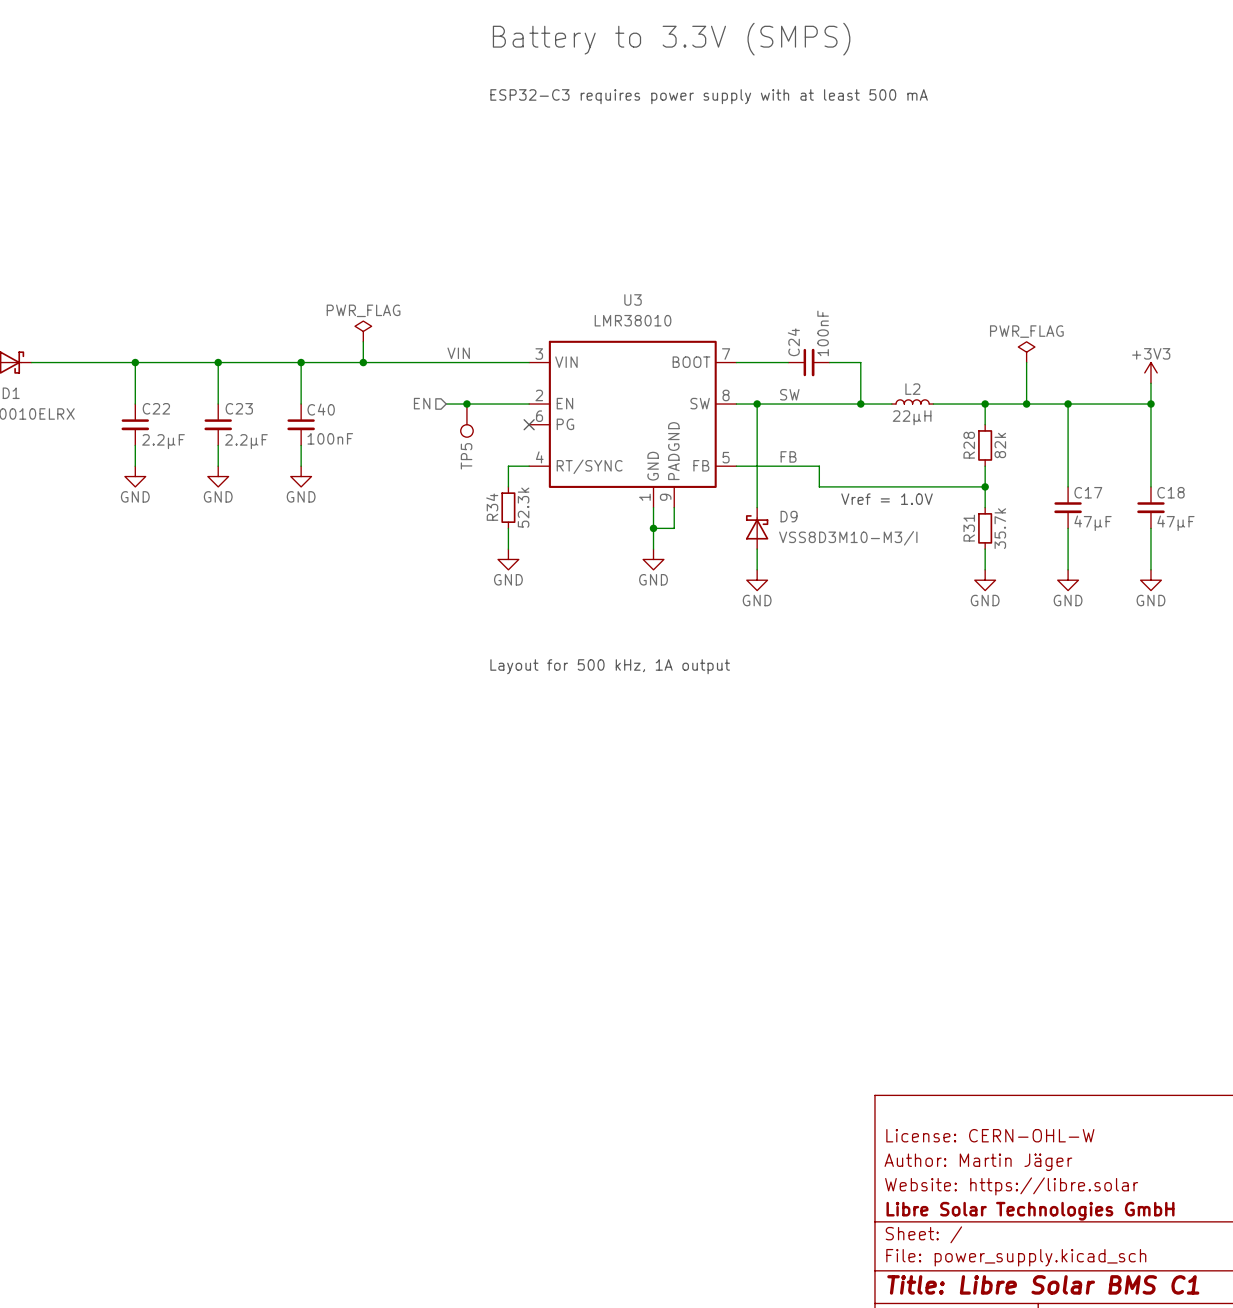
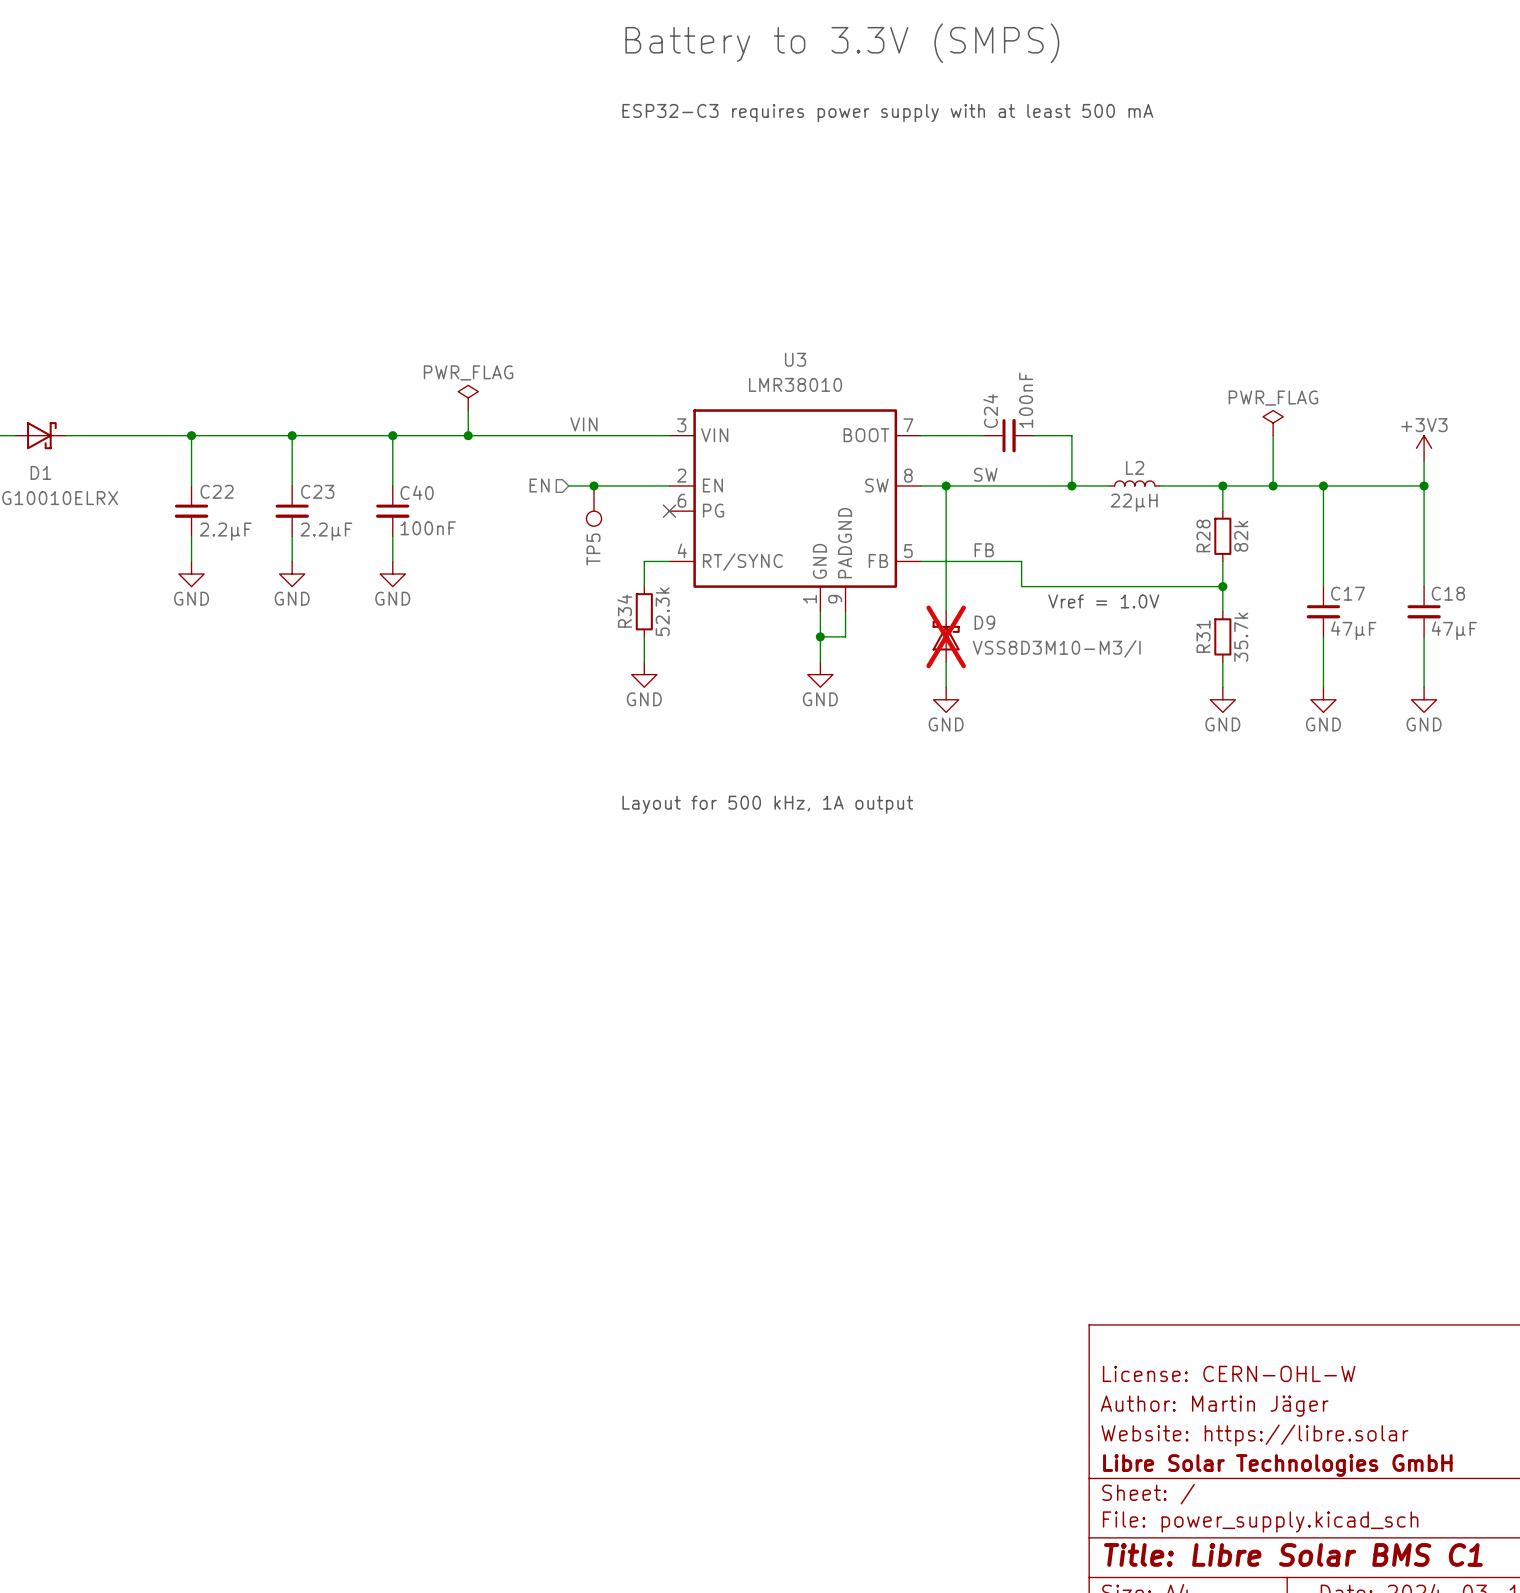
D9 do-not-place cross: none -> (946, 636)

